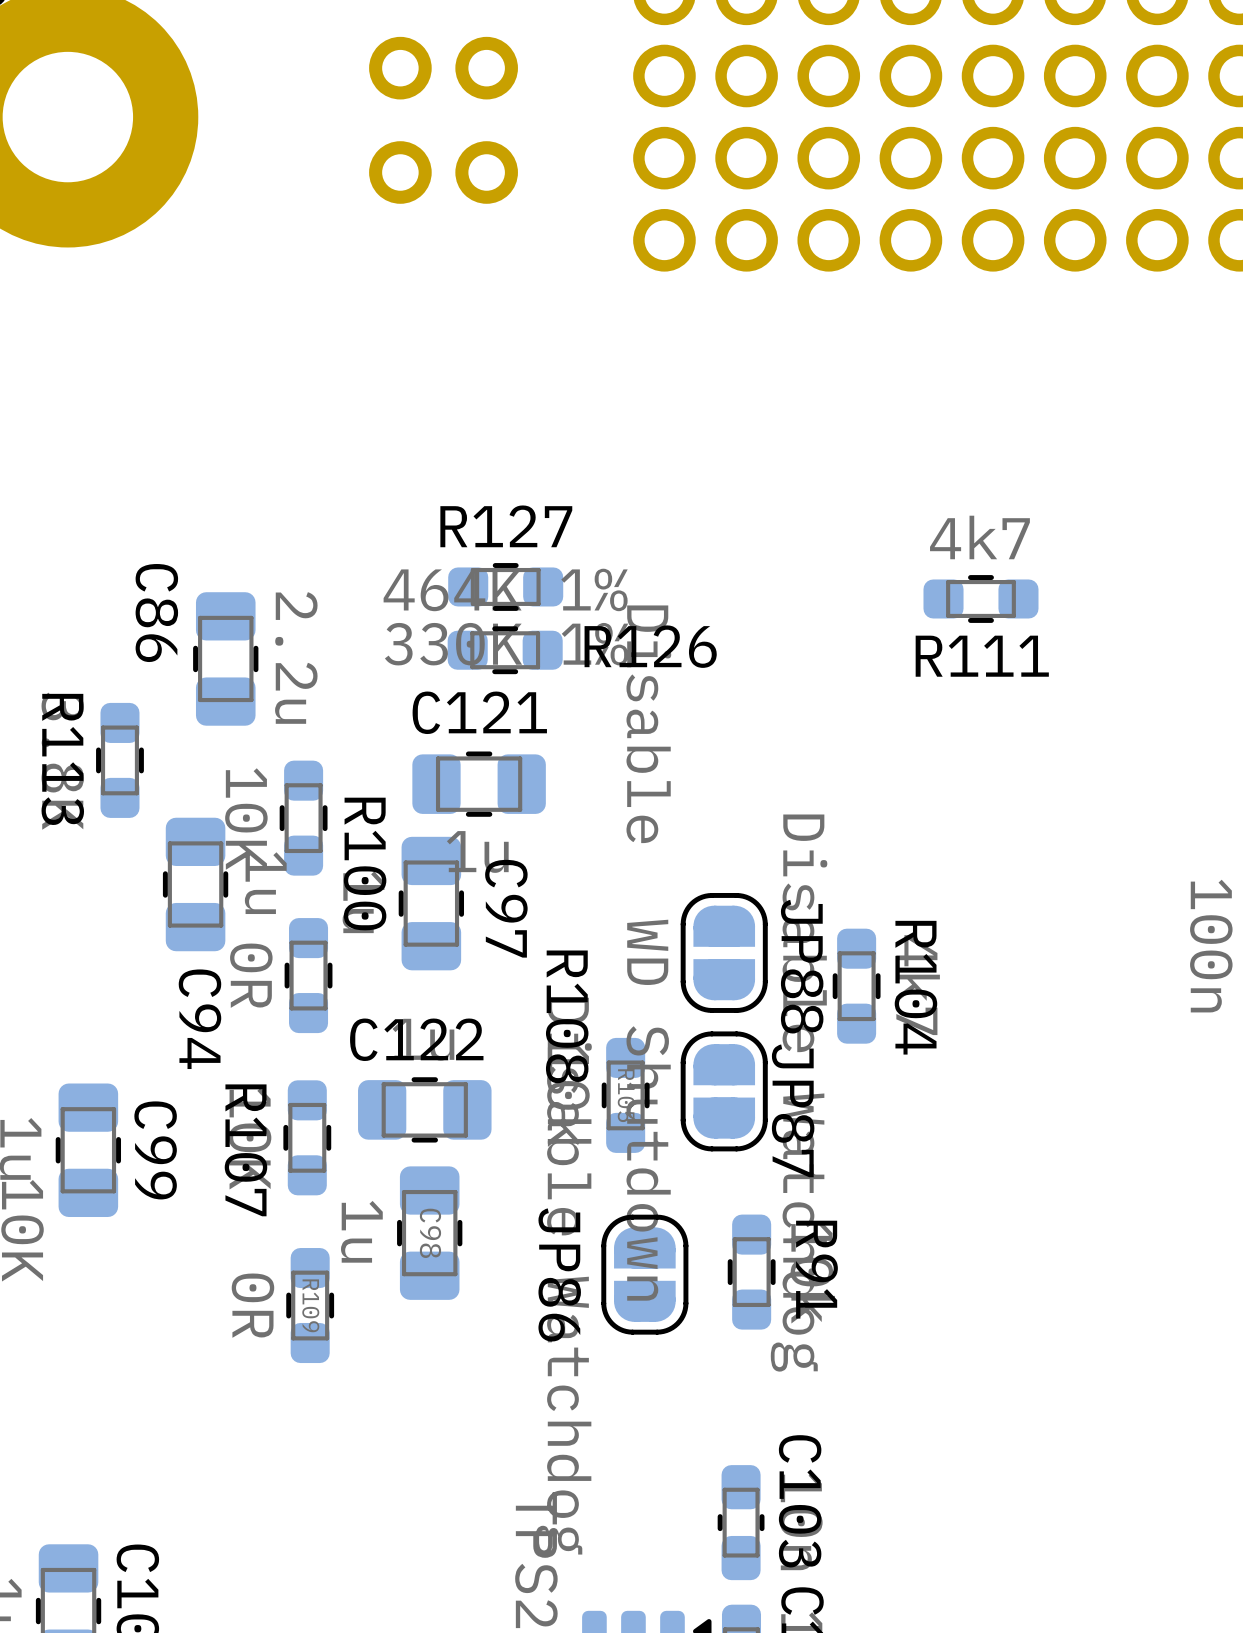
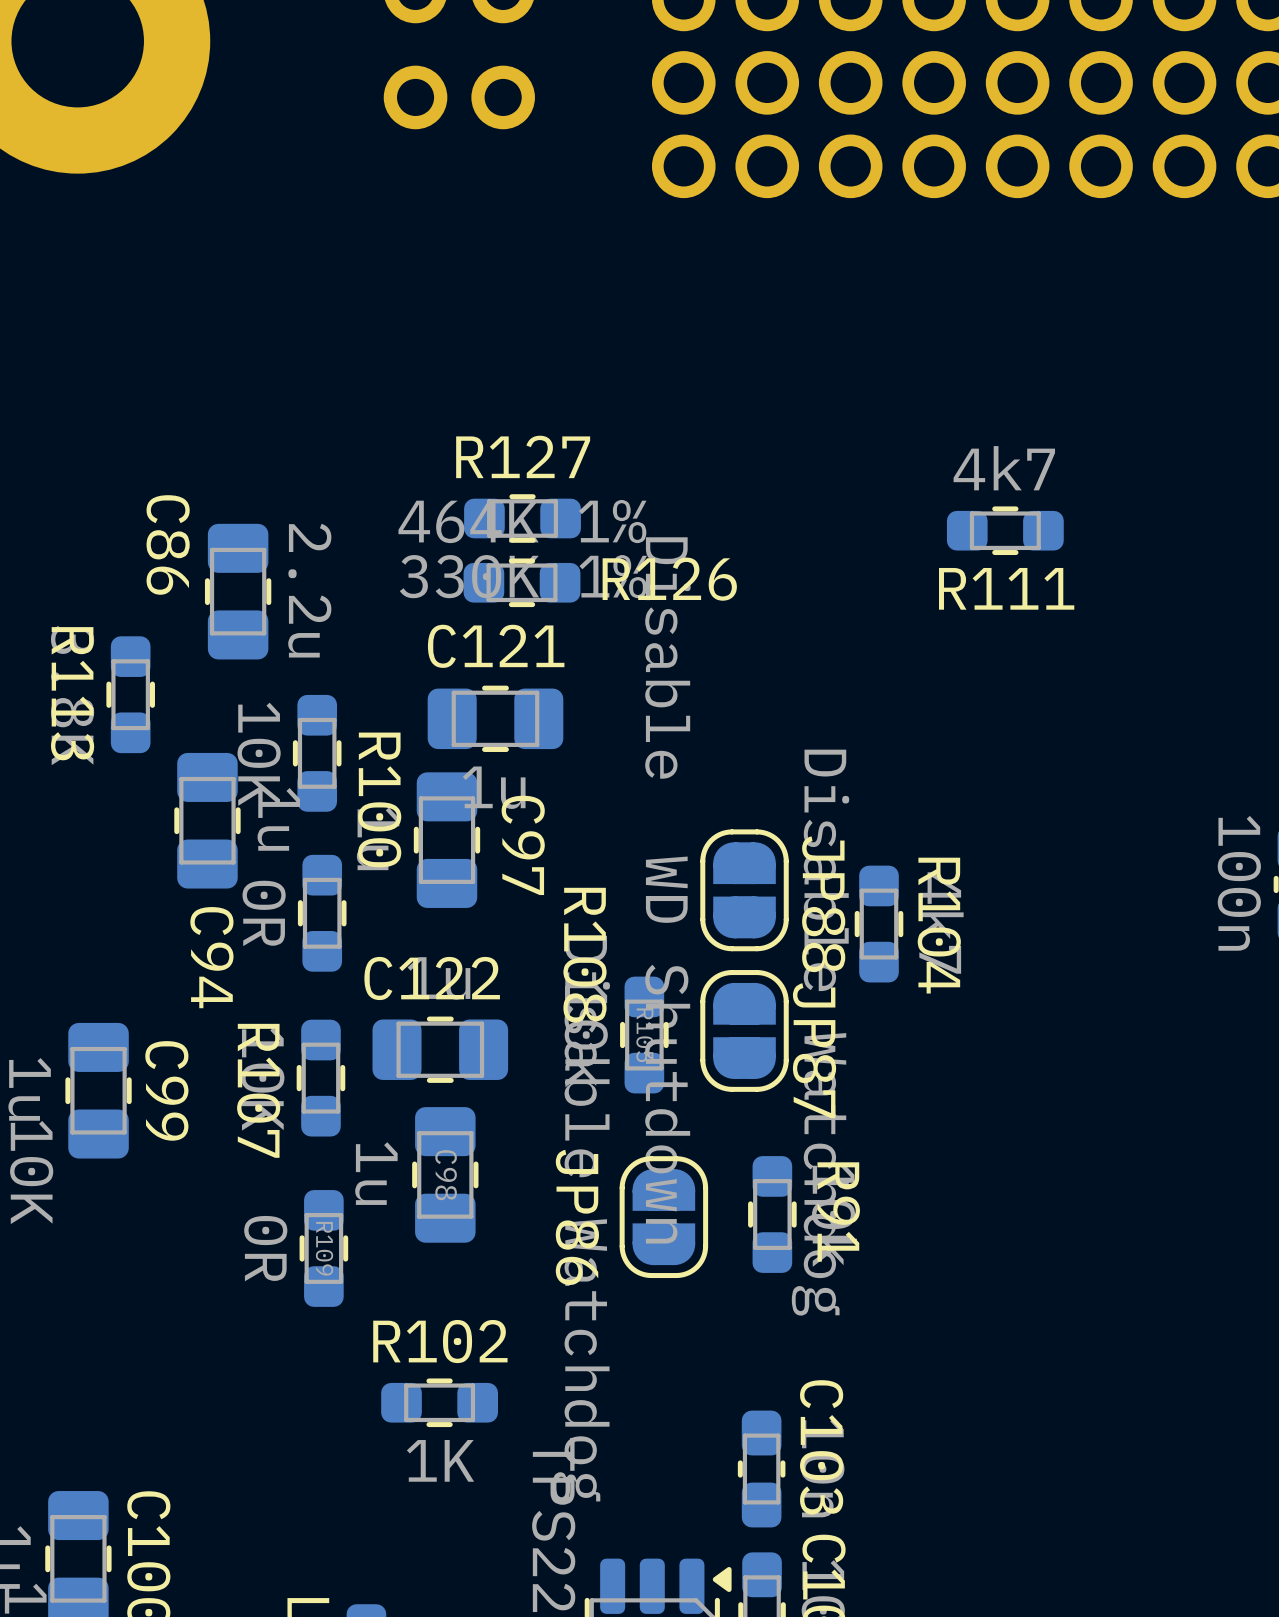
R102: none -> 1K (439, 1402)

